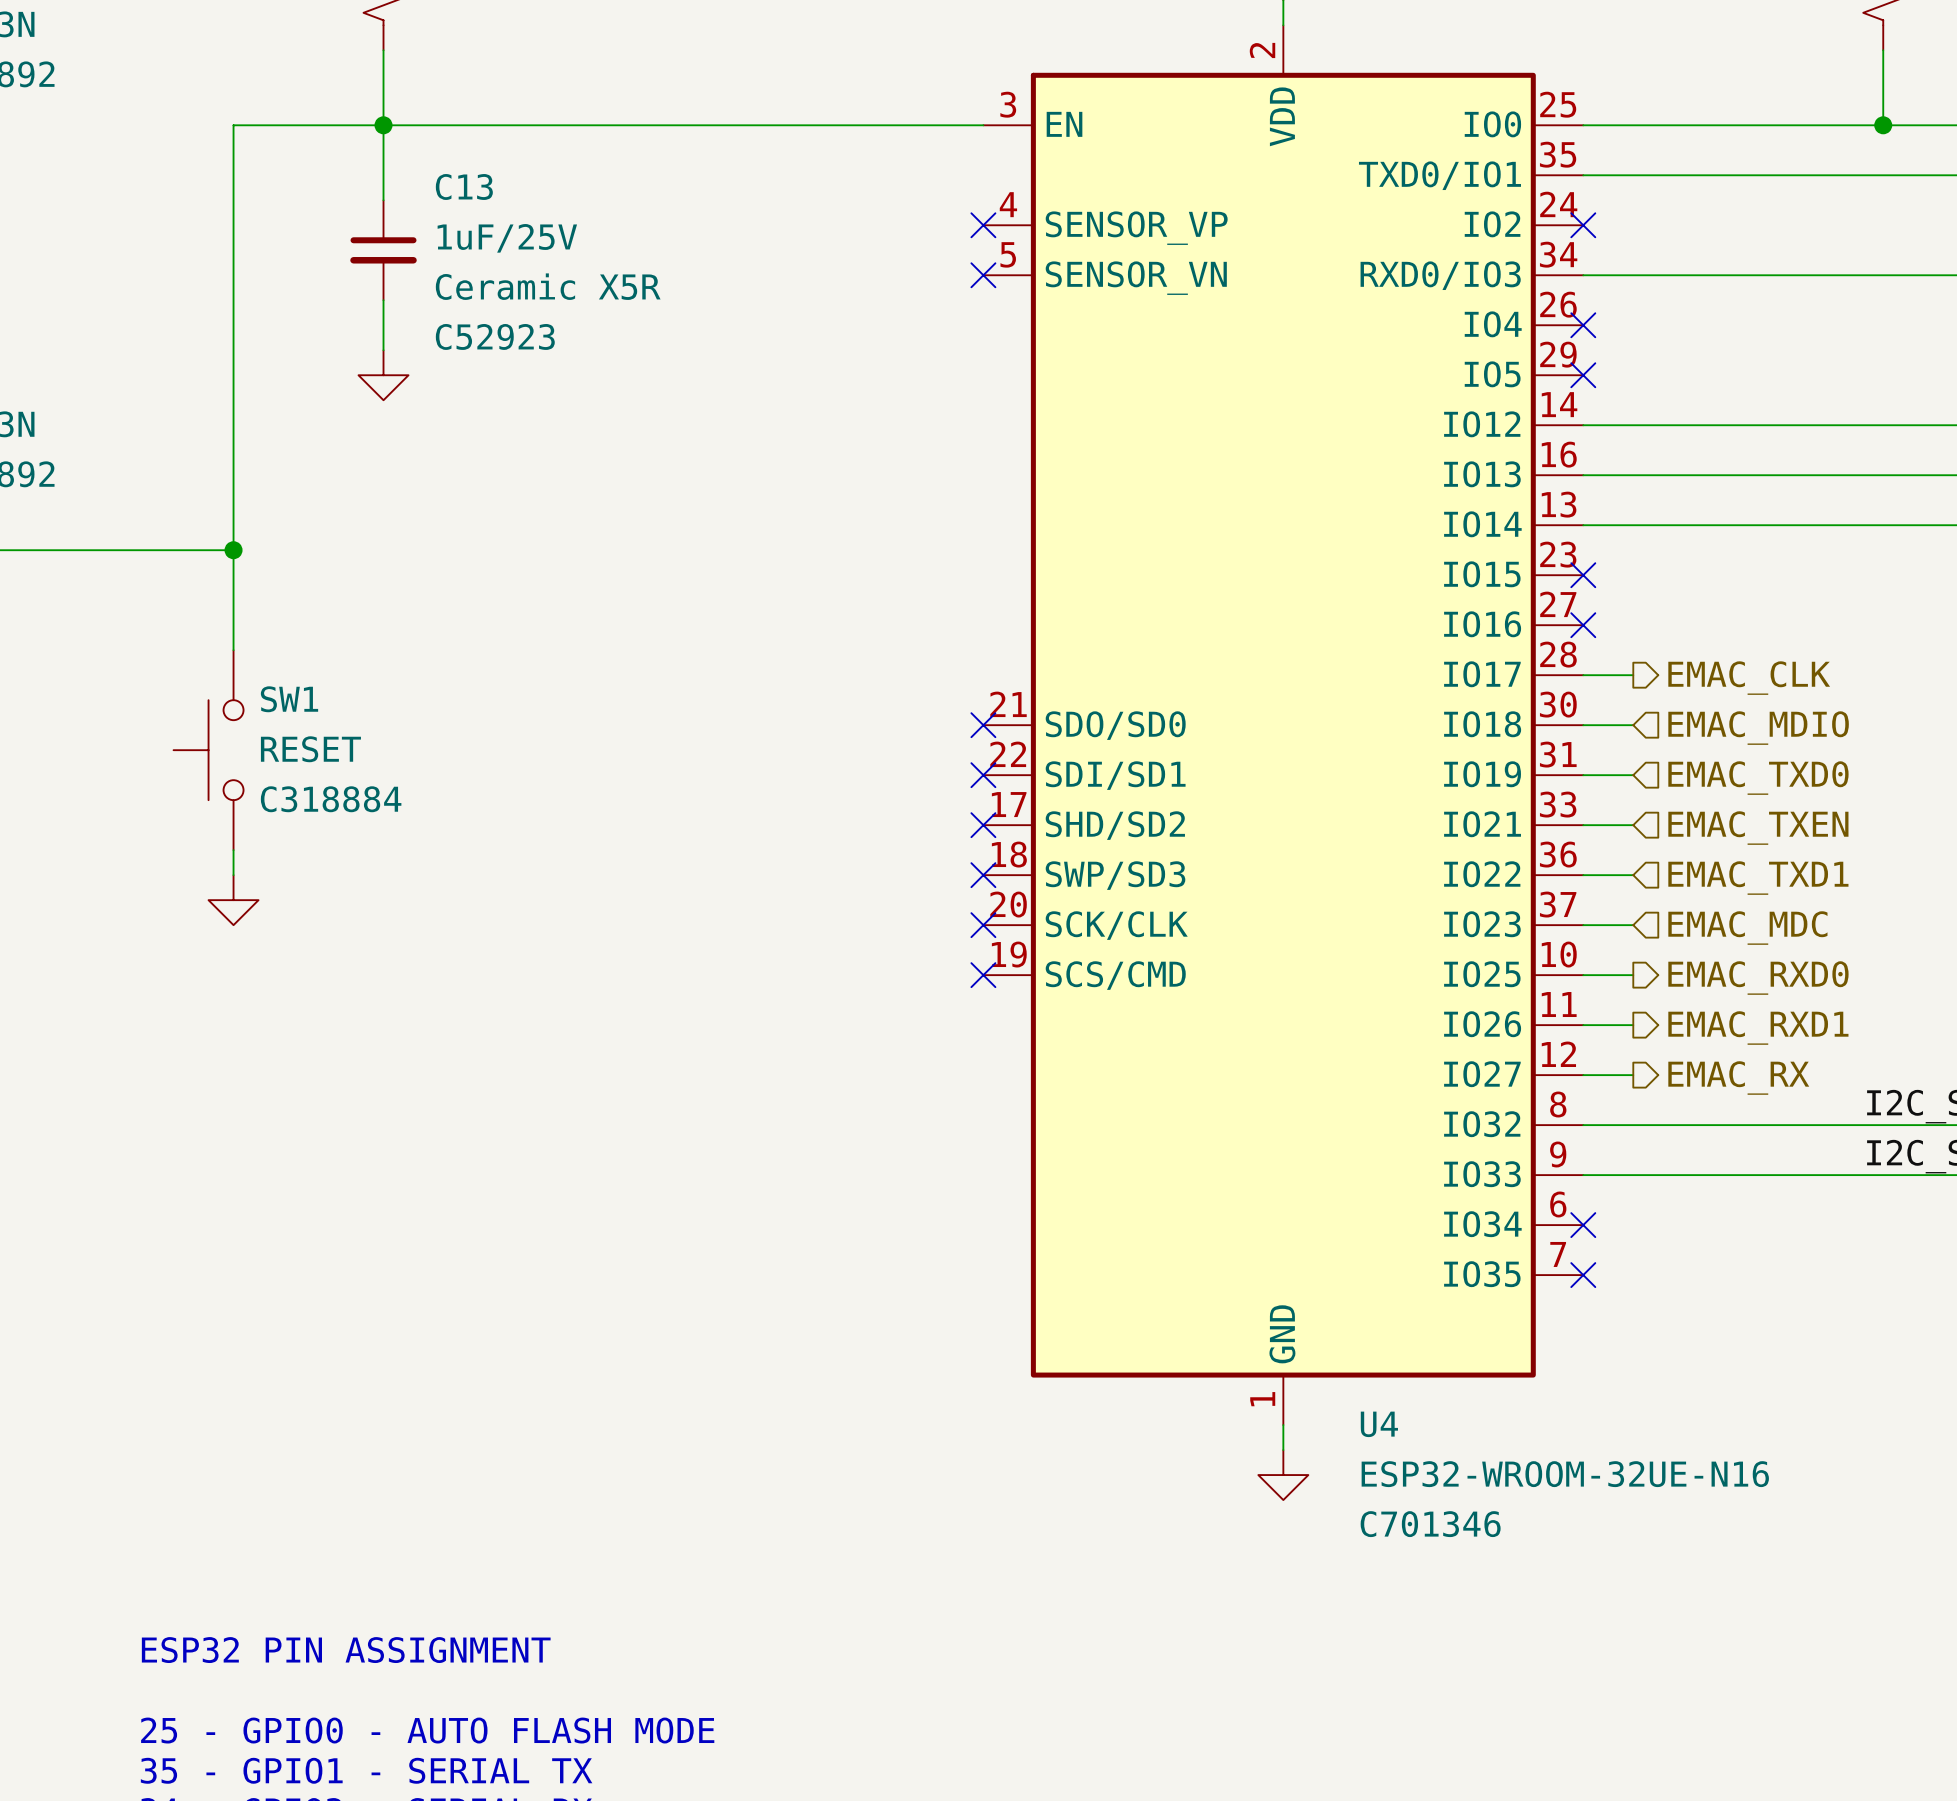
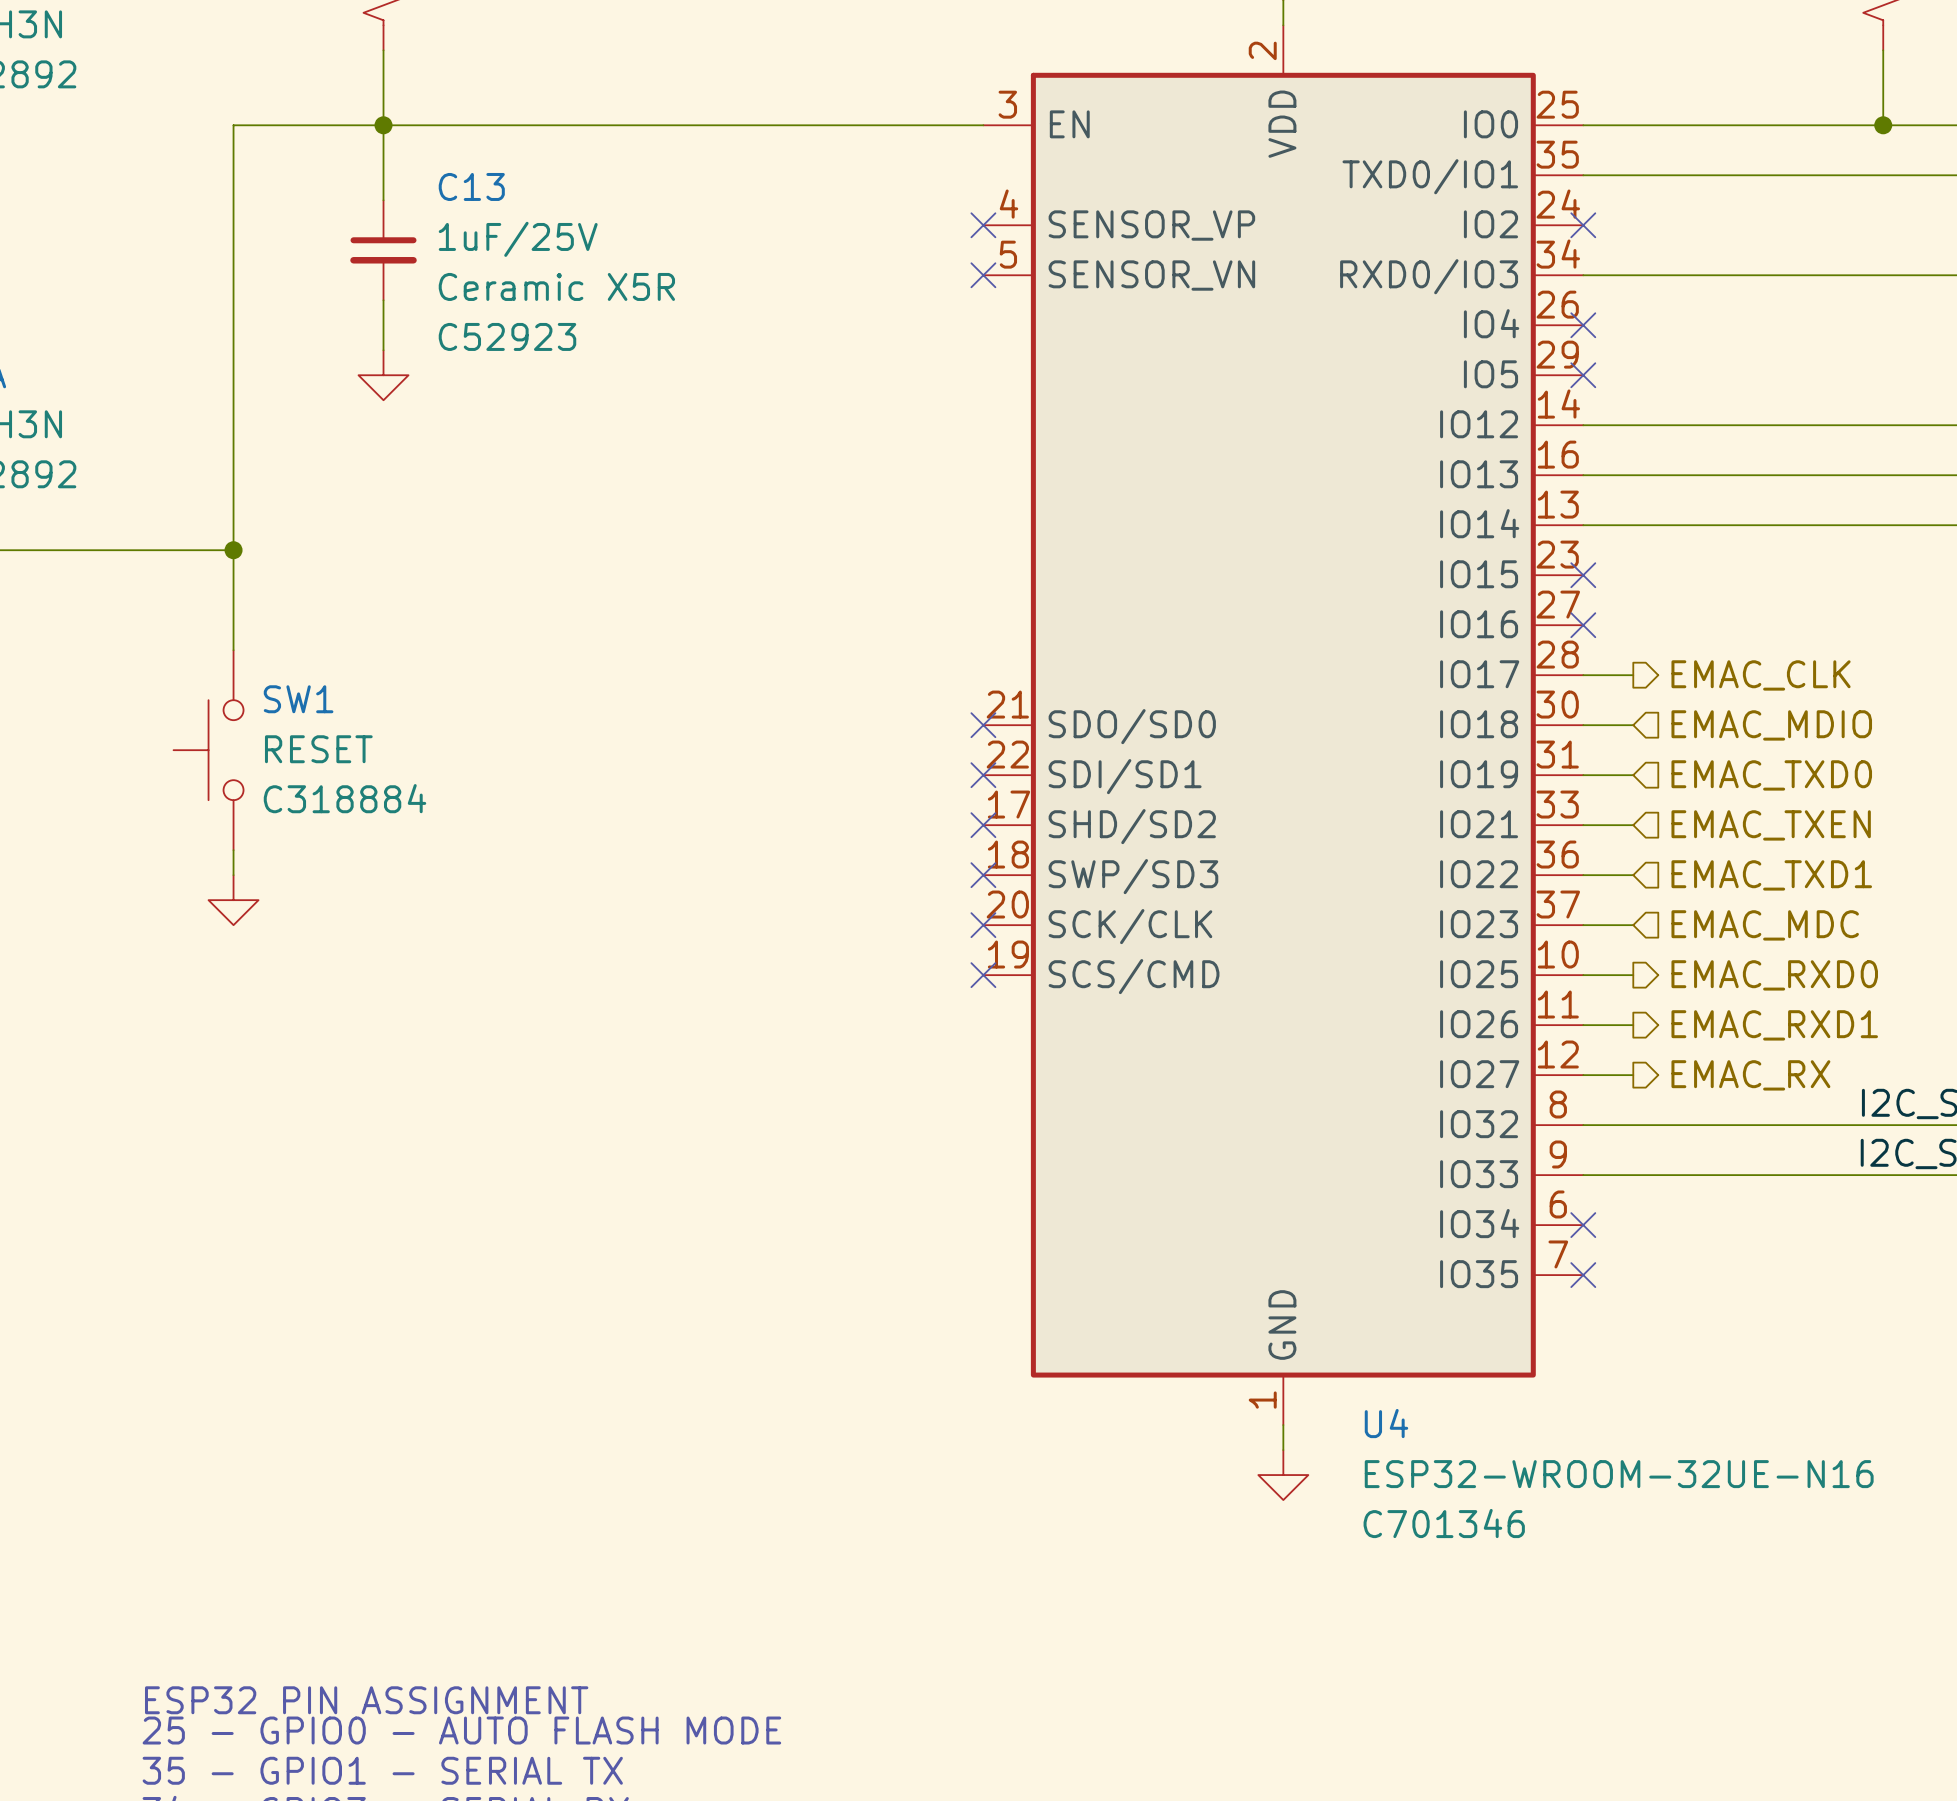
text position: ESP32 PIN ASSIGNMENT (346, 1650) -> ESP32 PIN ASSIGNMENT (366, 1700)

